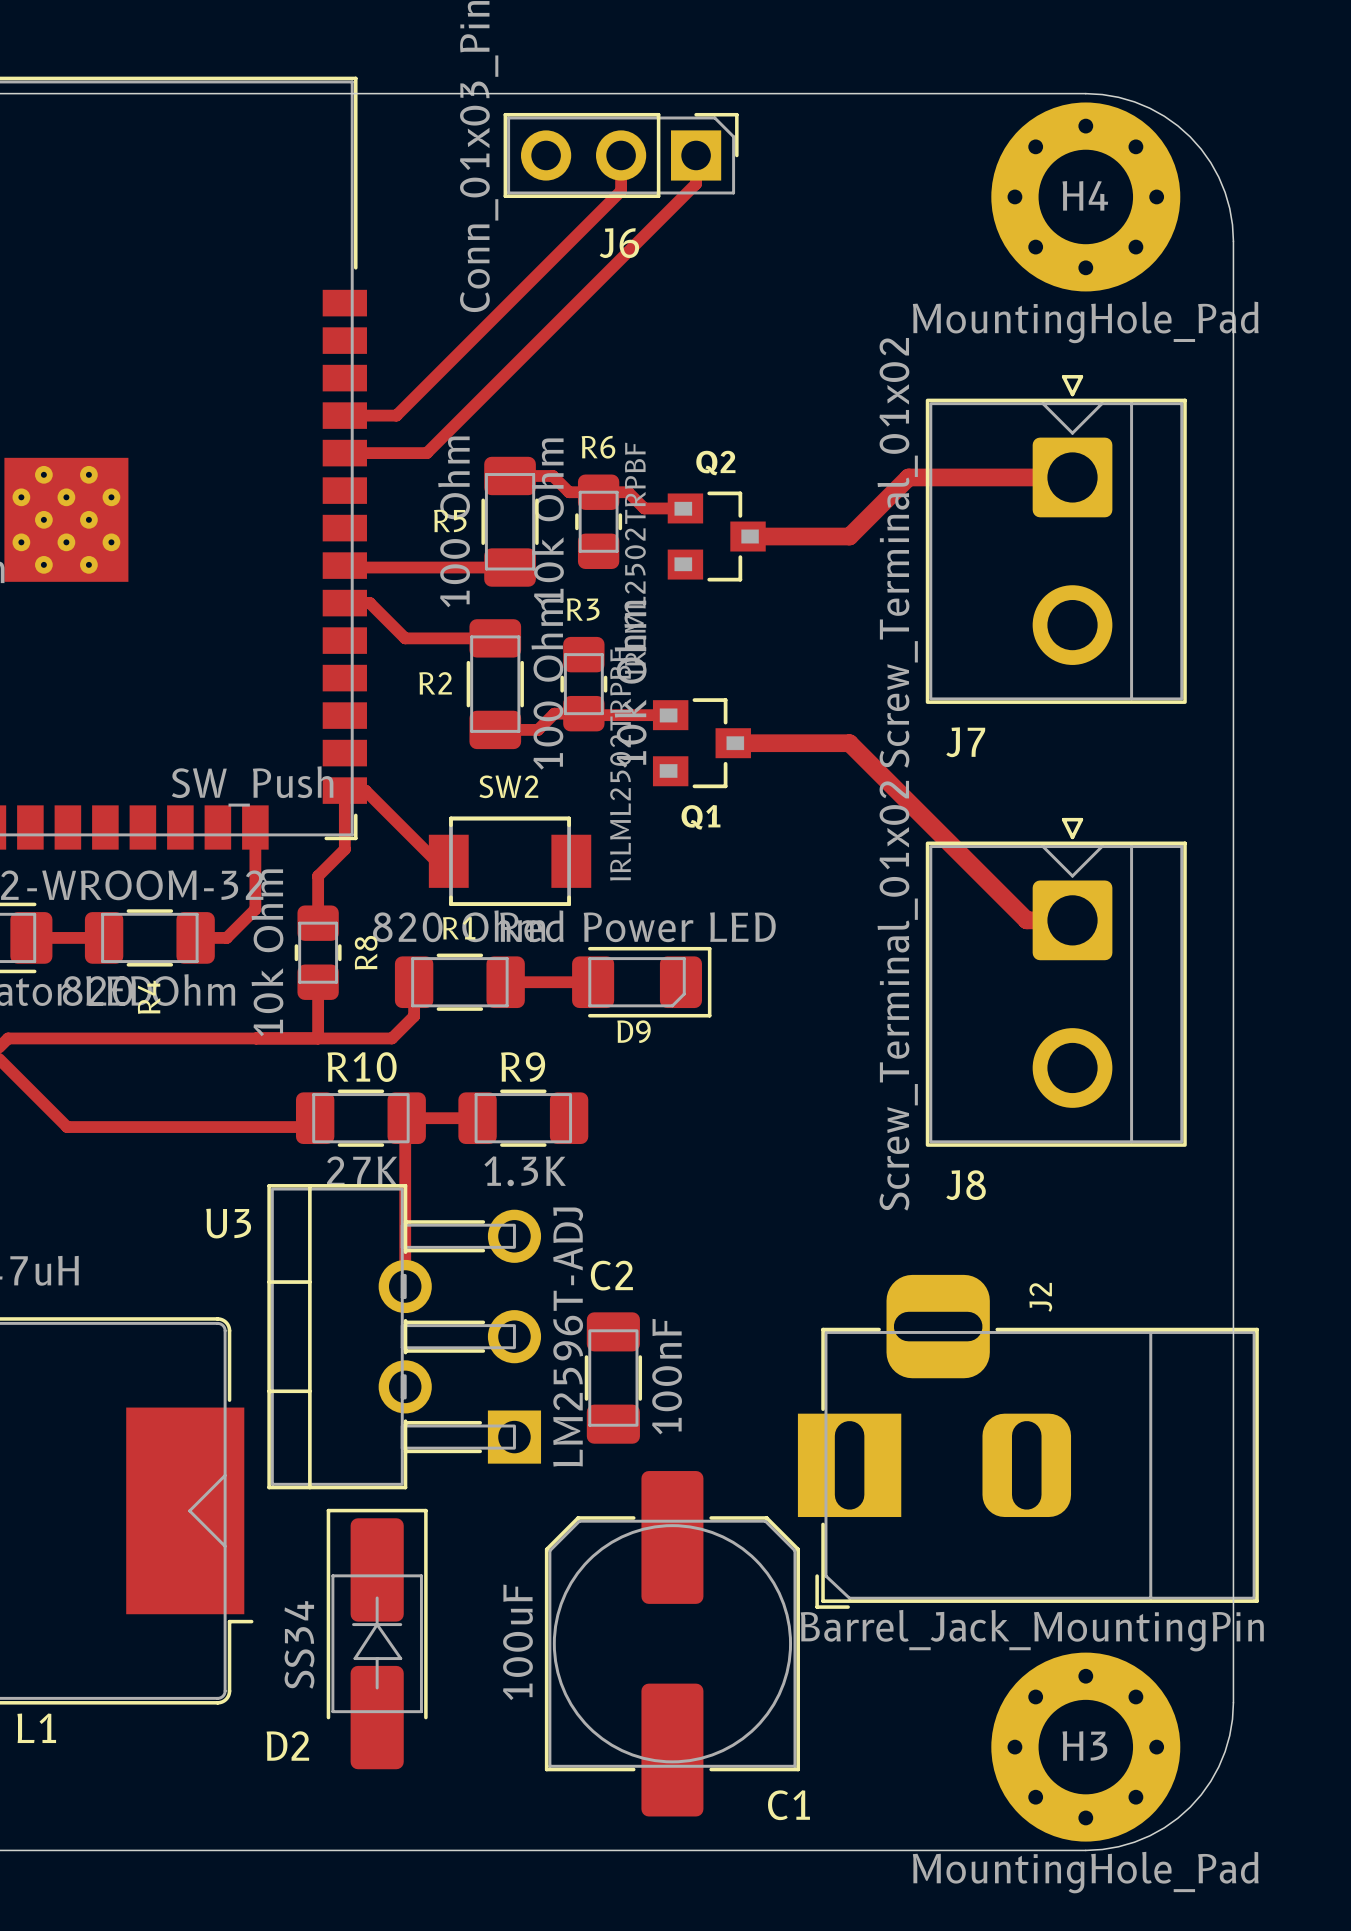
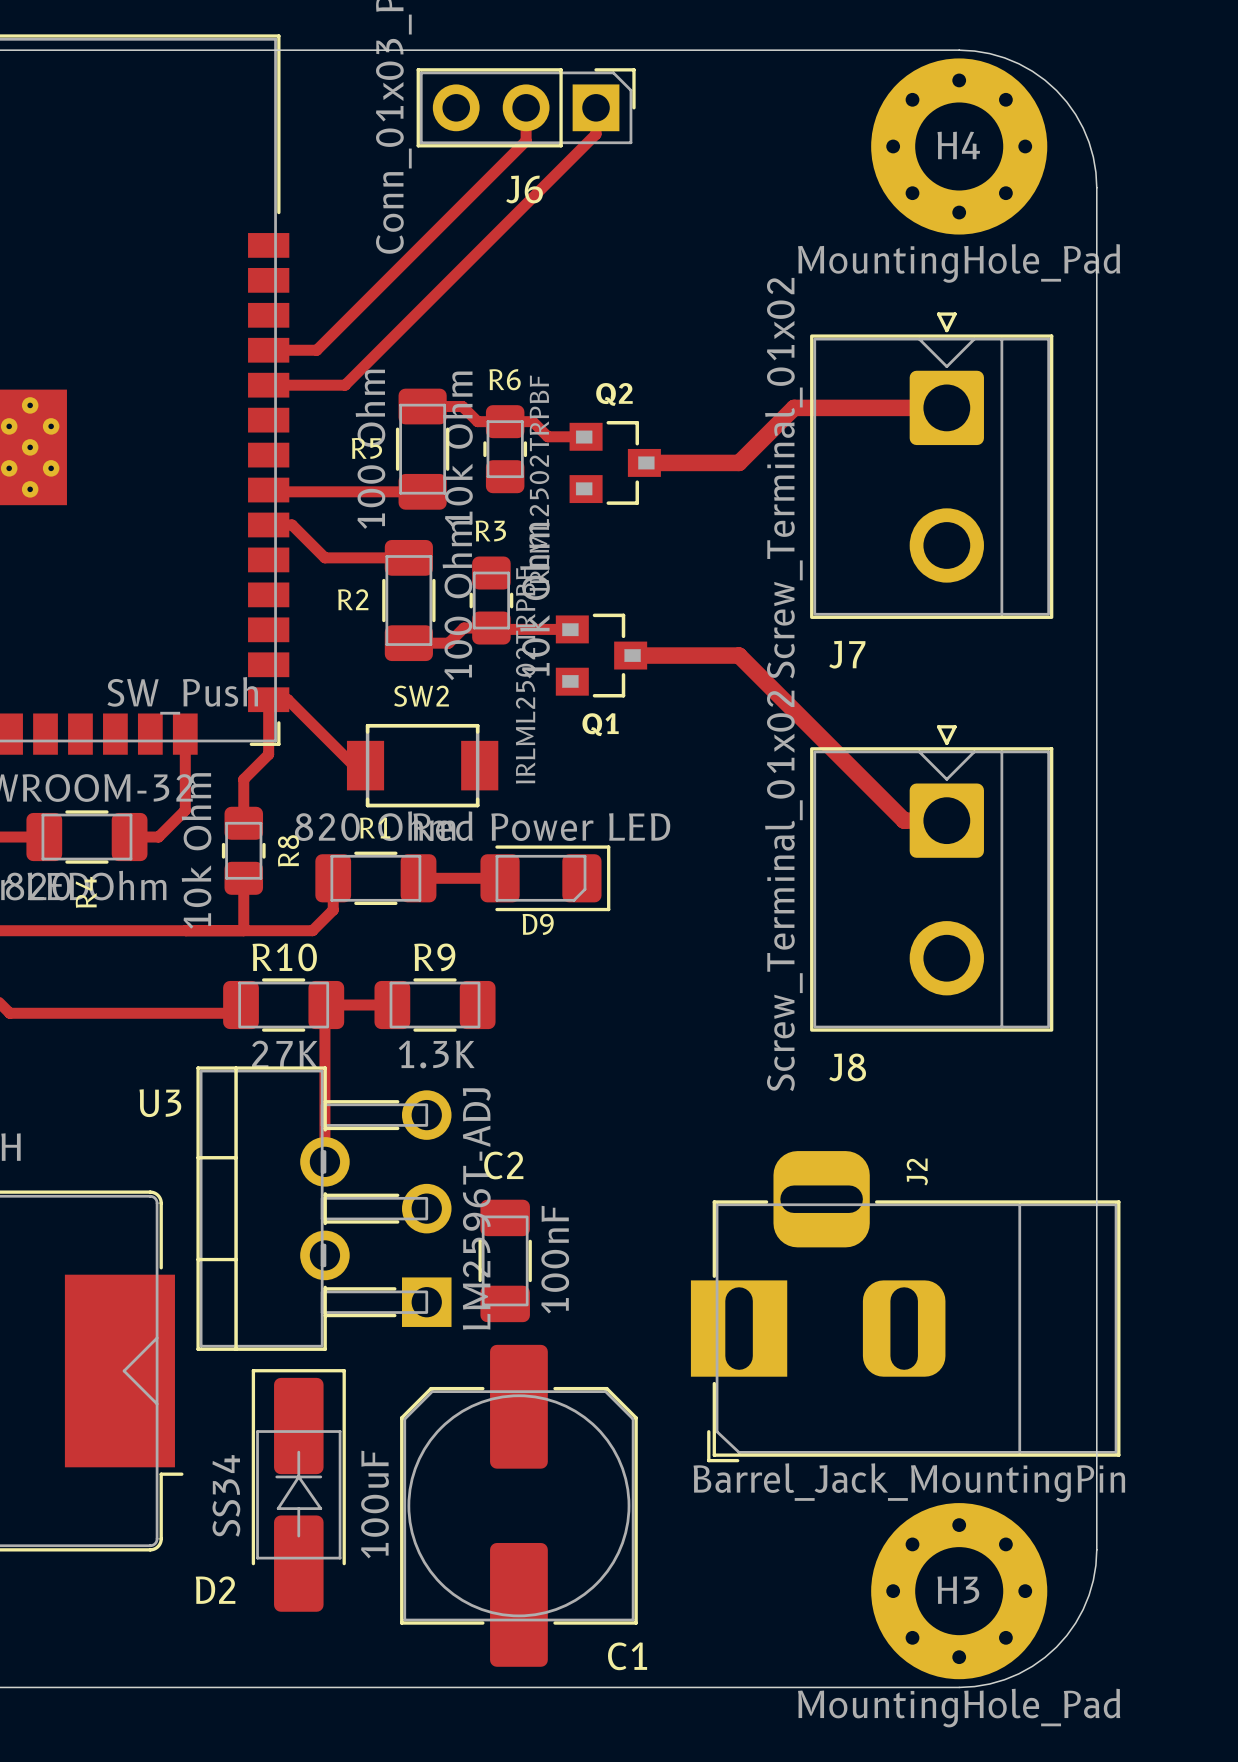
C2 position: (613, 1378) -> (505, 1260)
C1 position: (672, 1643) -> (518, 1505)

